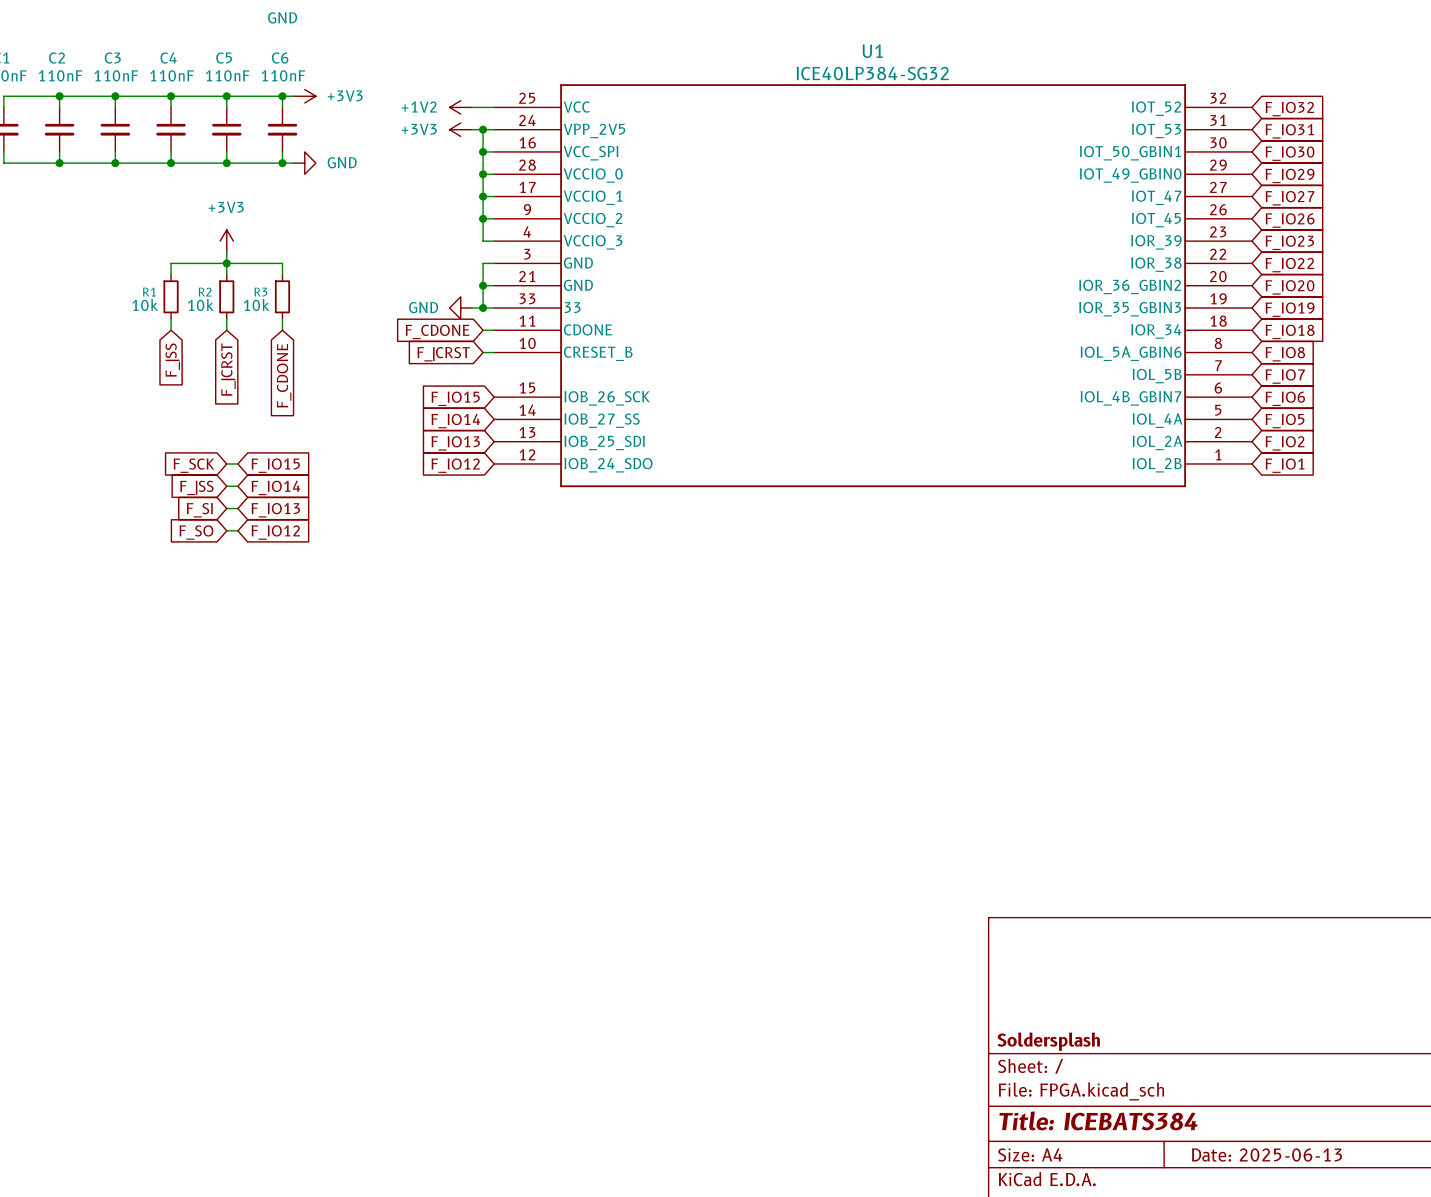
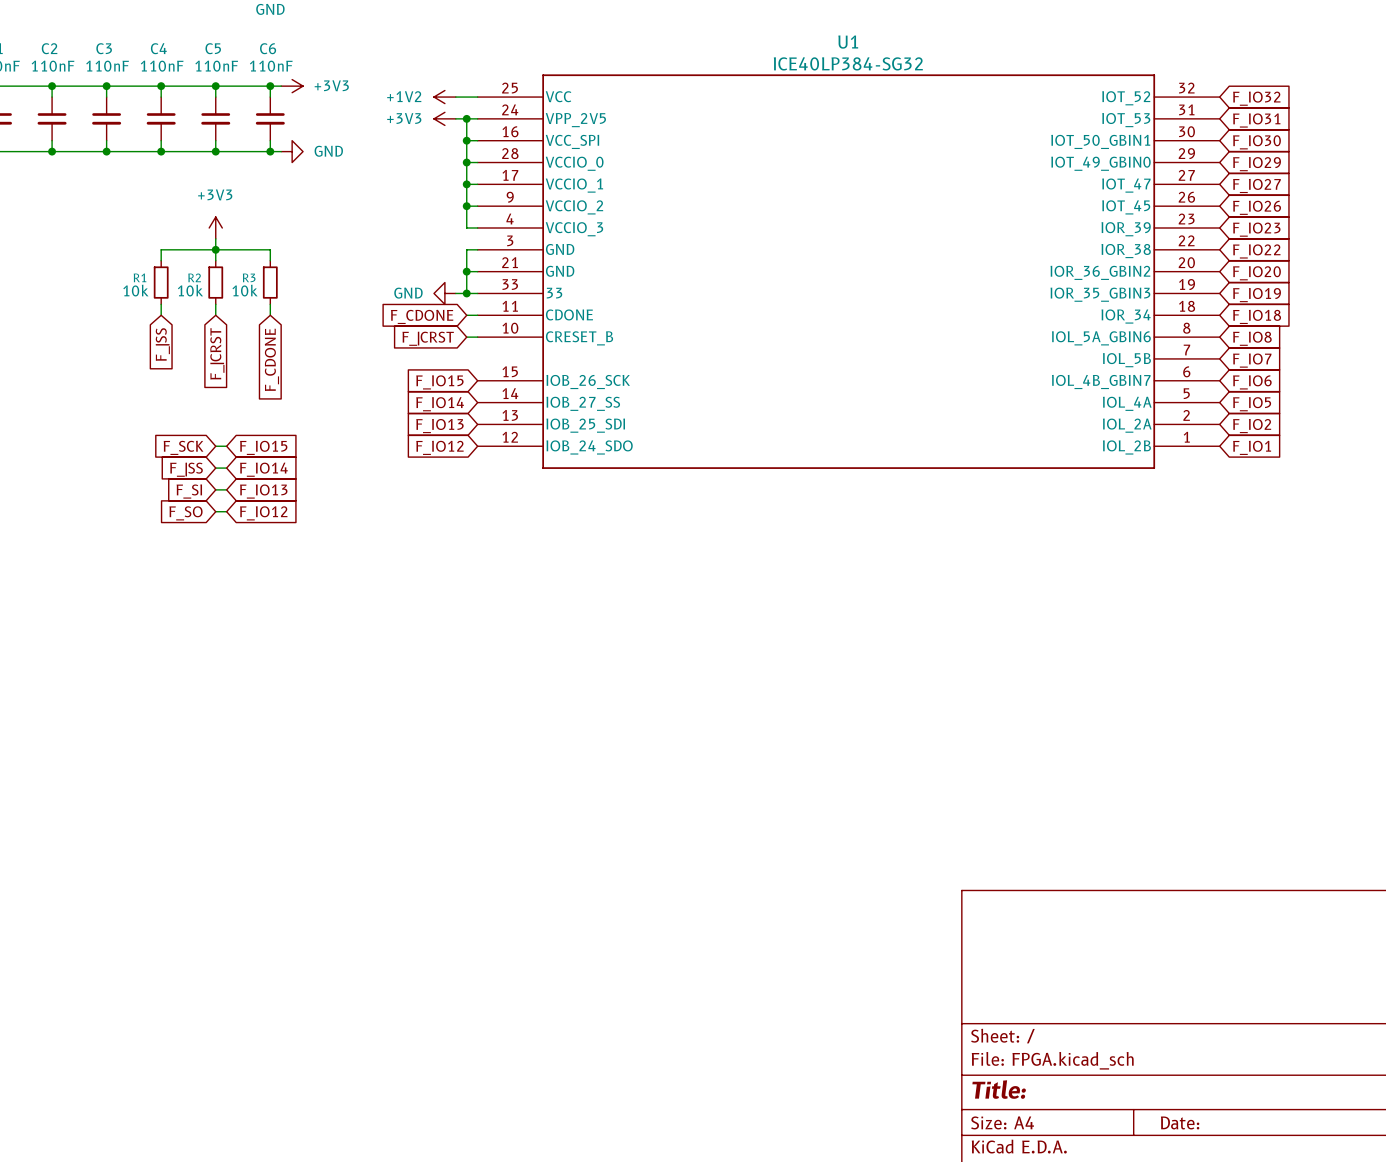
title block: Soldersplash (1048, 1041) -> none
title block: Title: ICEBATS384 (1098, 1120) -> Title: (999, 1089)
title block: Date: 2025-06-13 (1266, 1154) -> Date: (1180, 1122)

